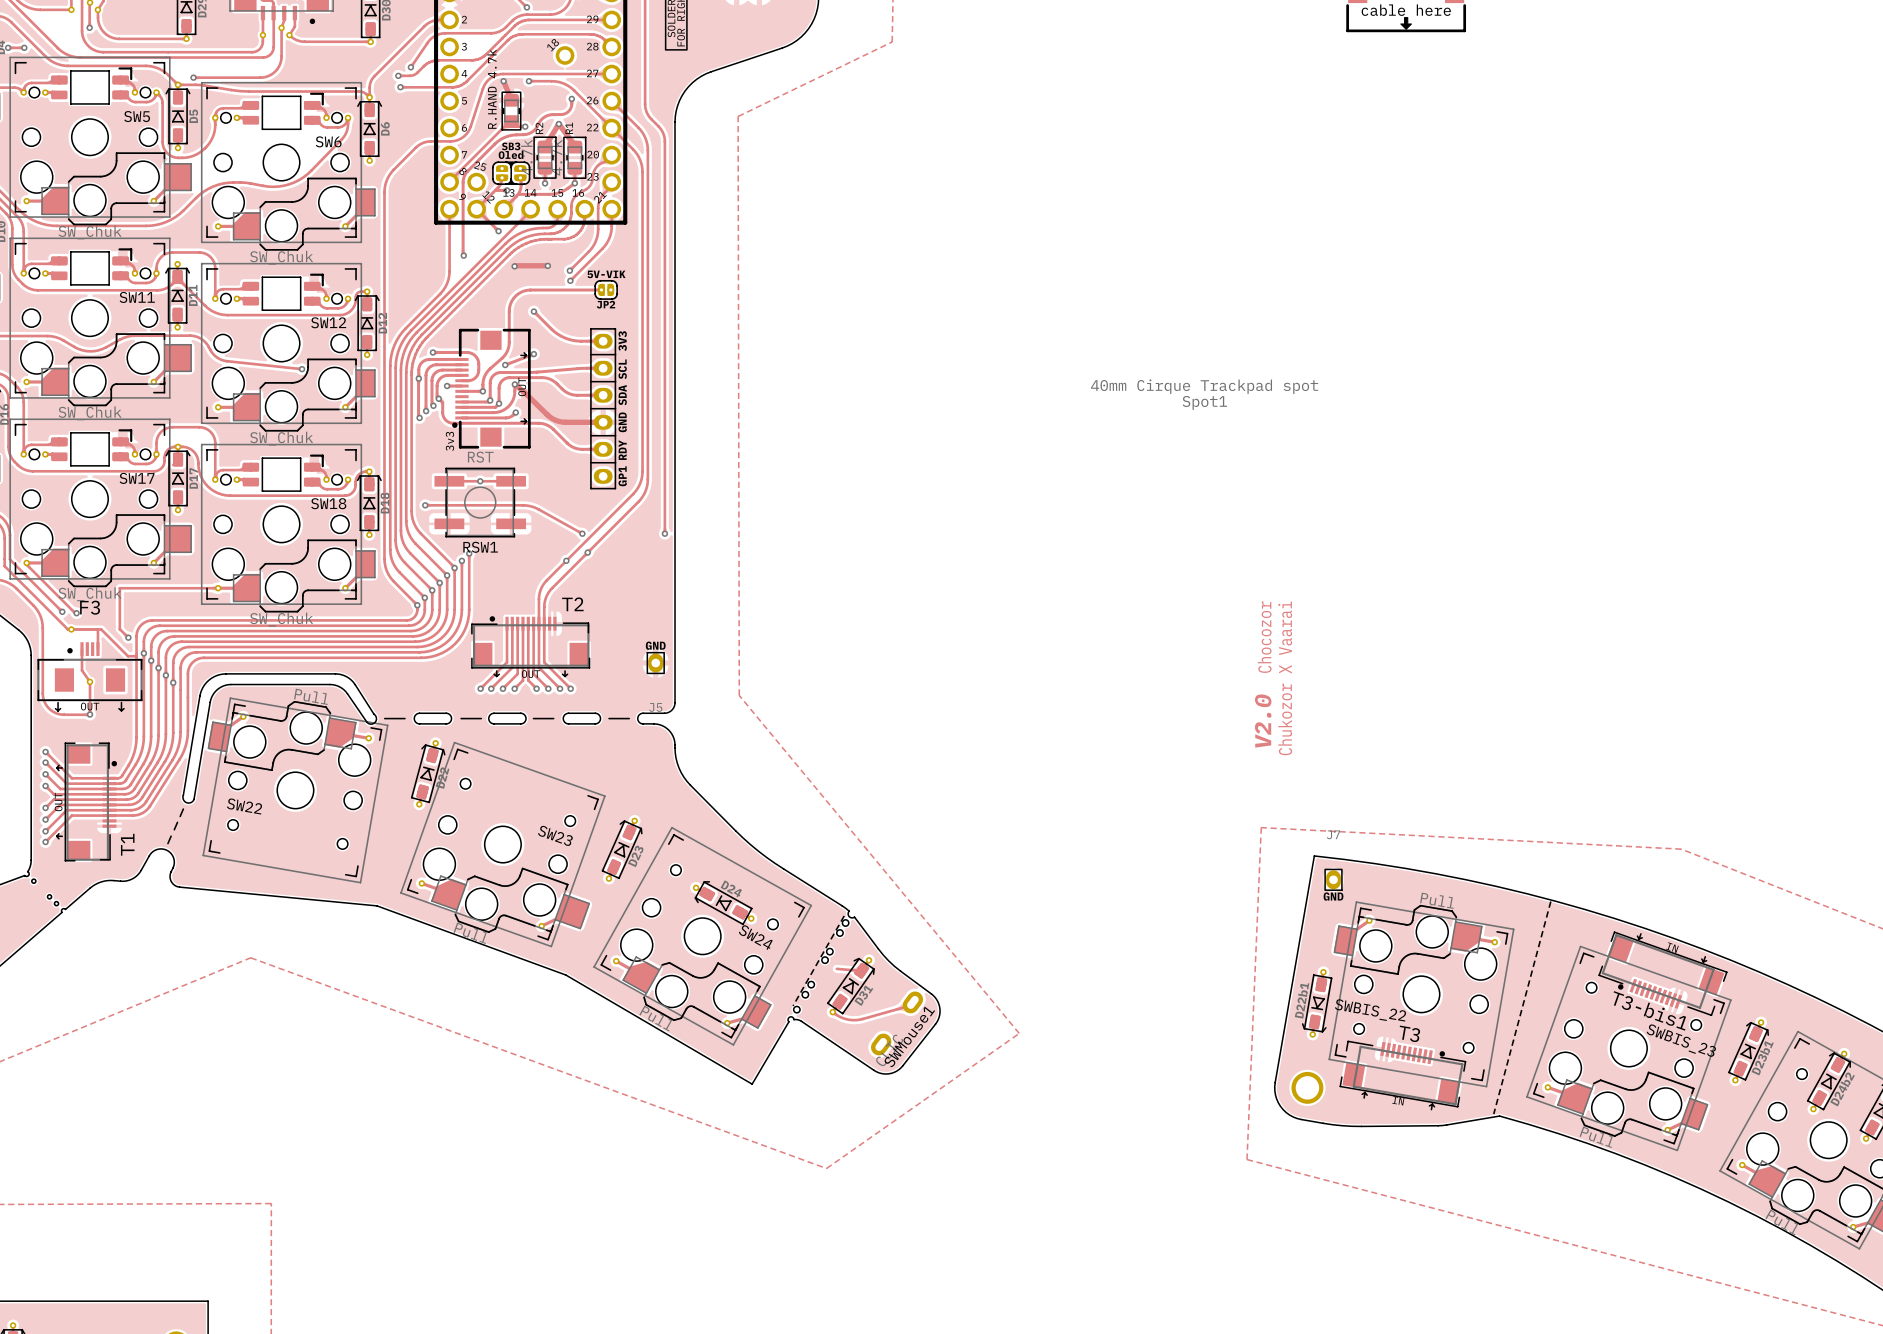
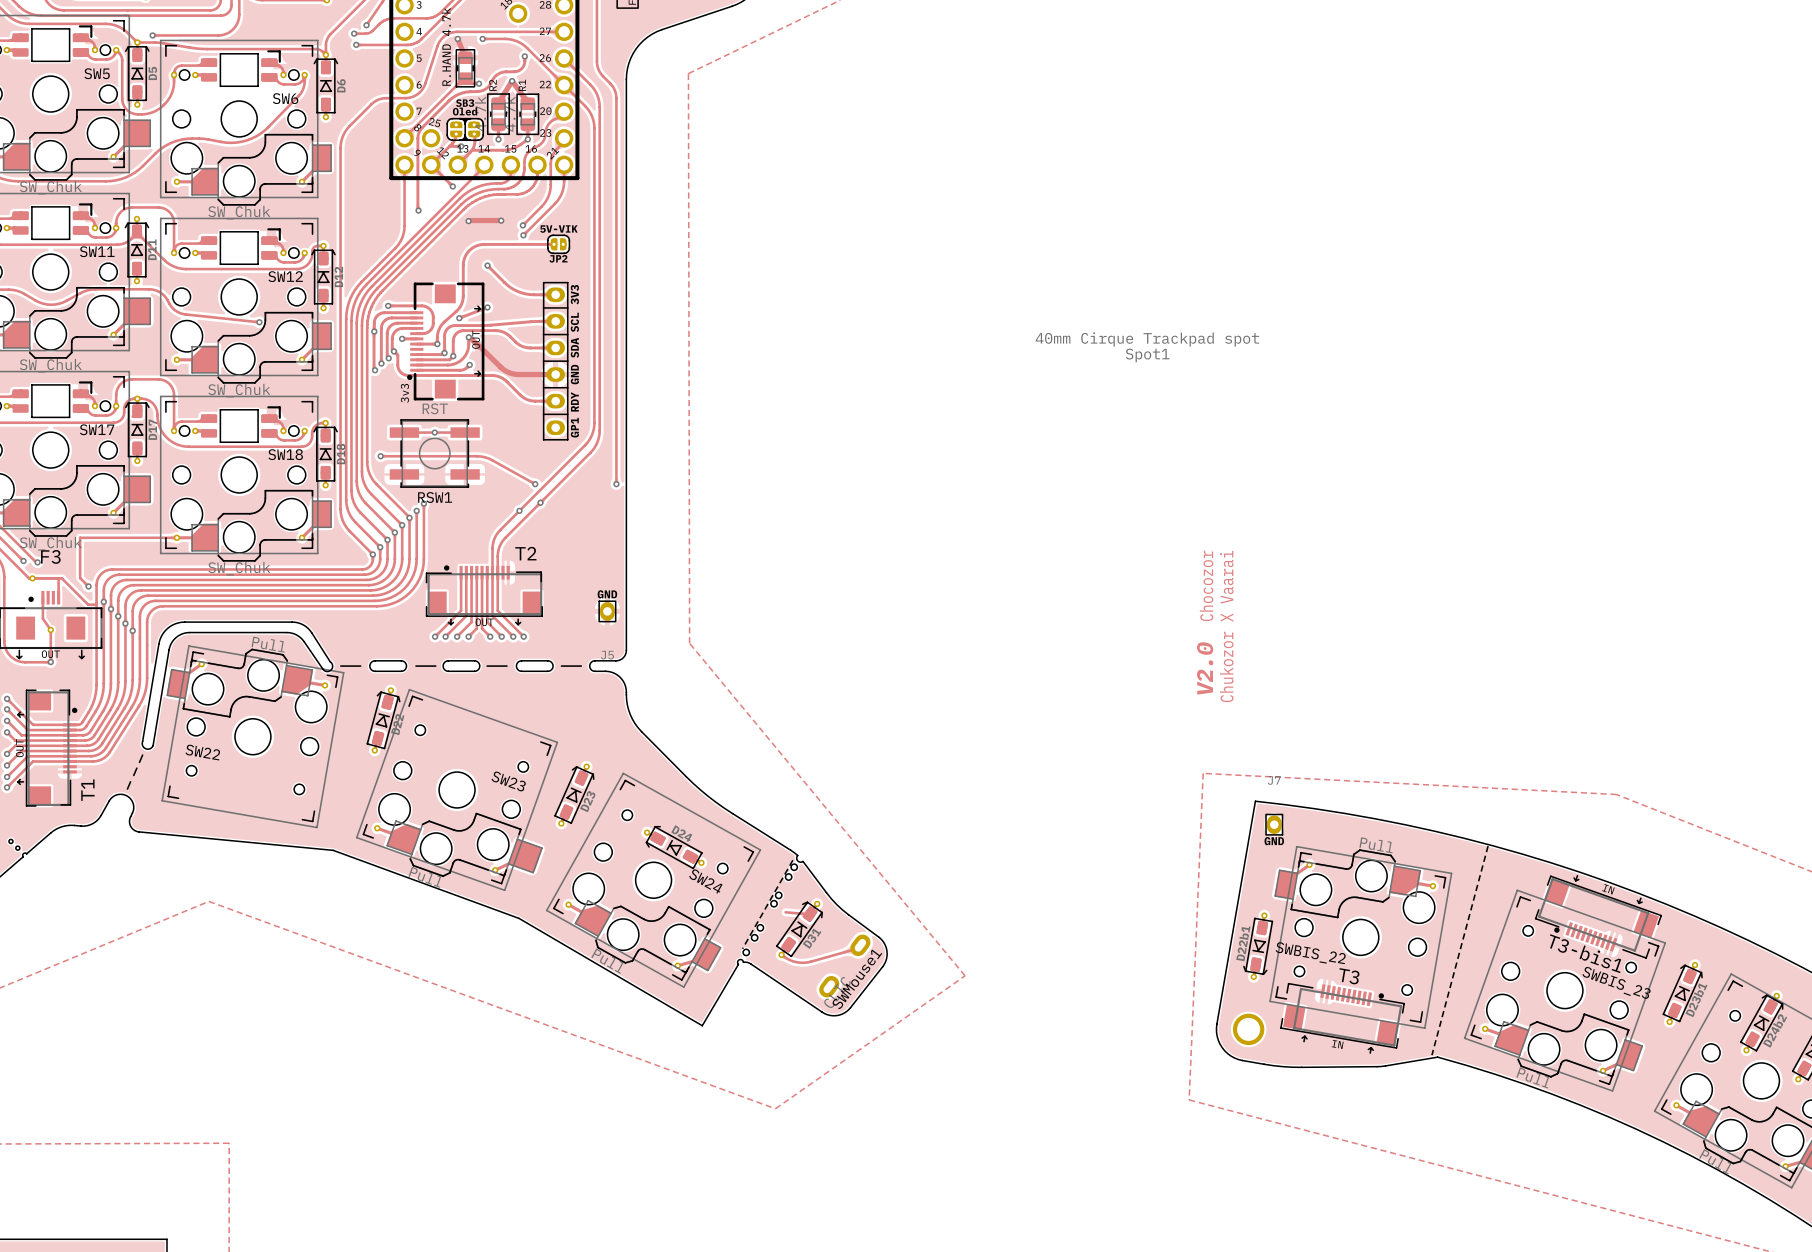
T3-bis1 footprint: [1598, 931, 1728, 1016] -> [1535, 875, 1662, 959]
T3 footprint: [1339, 1040, 1467, 1111] -> [1280, 983, 1405, 1054]

